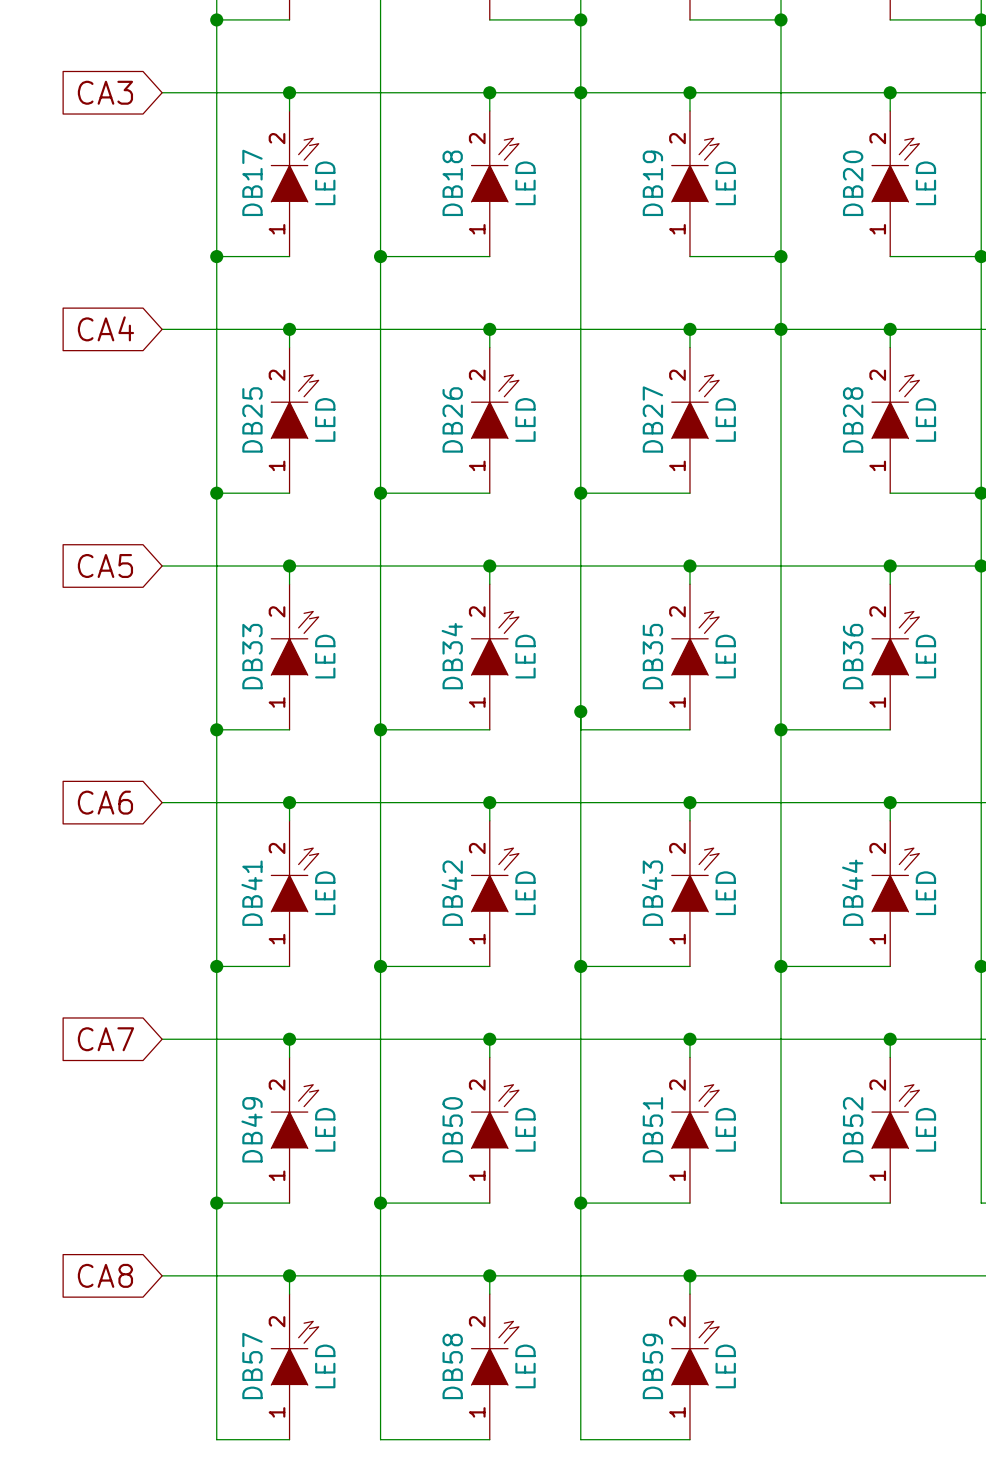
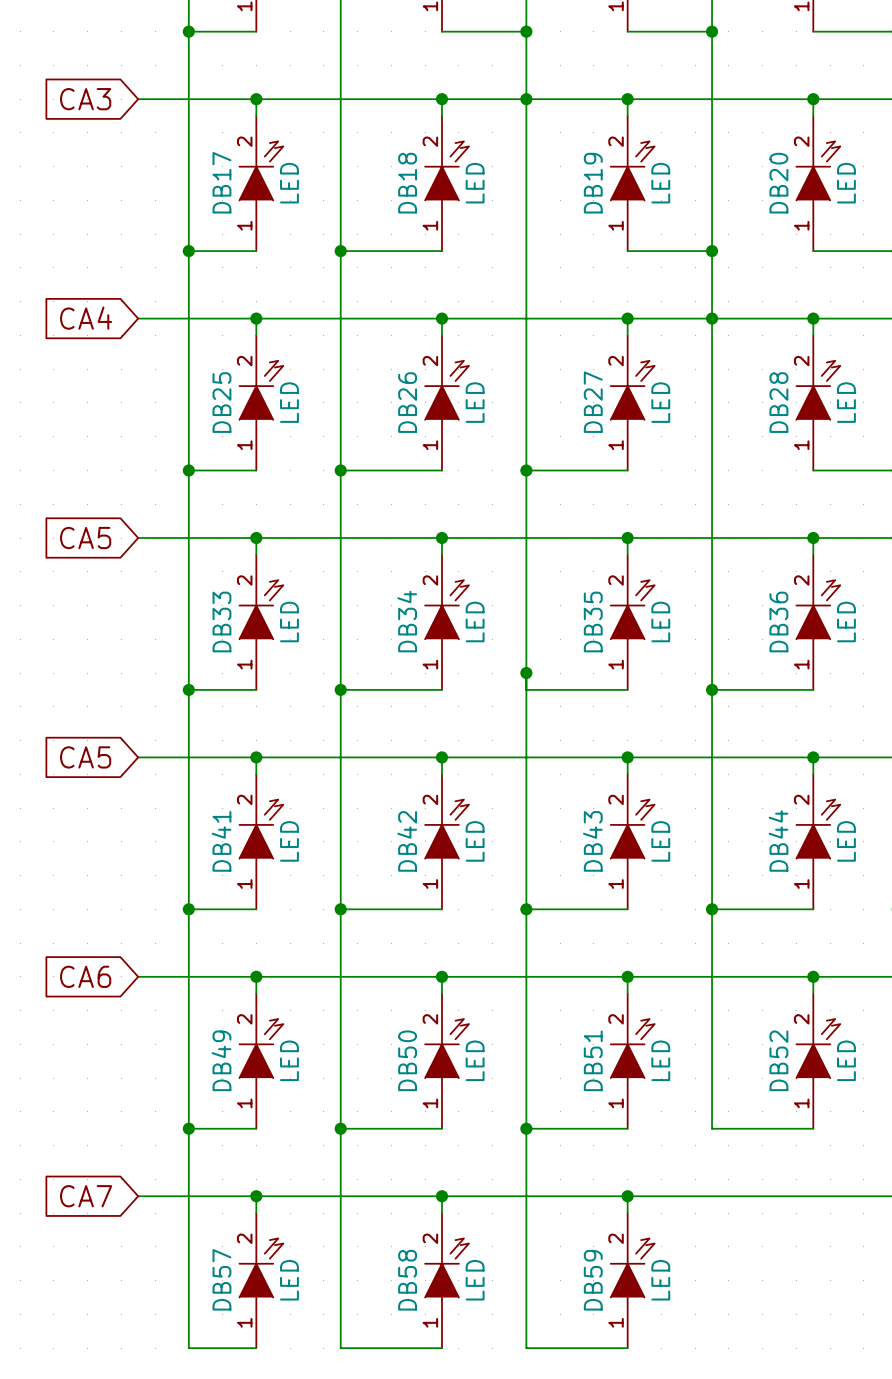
global label: CA6 (105, 802) -> CA5 (85, 757)
global label: CA7 (105, 1039) -> CA6 (85, 976)
global label: CA8 (105, 1275) -> CA7 (86, 1196)

